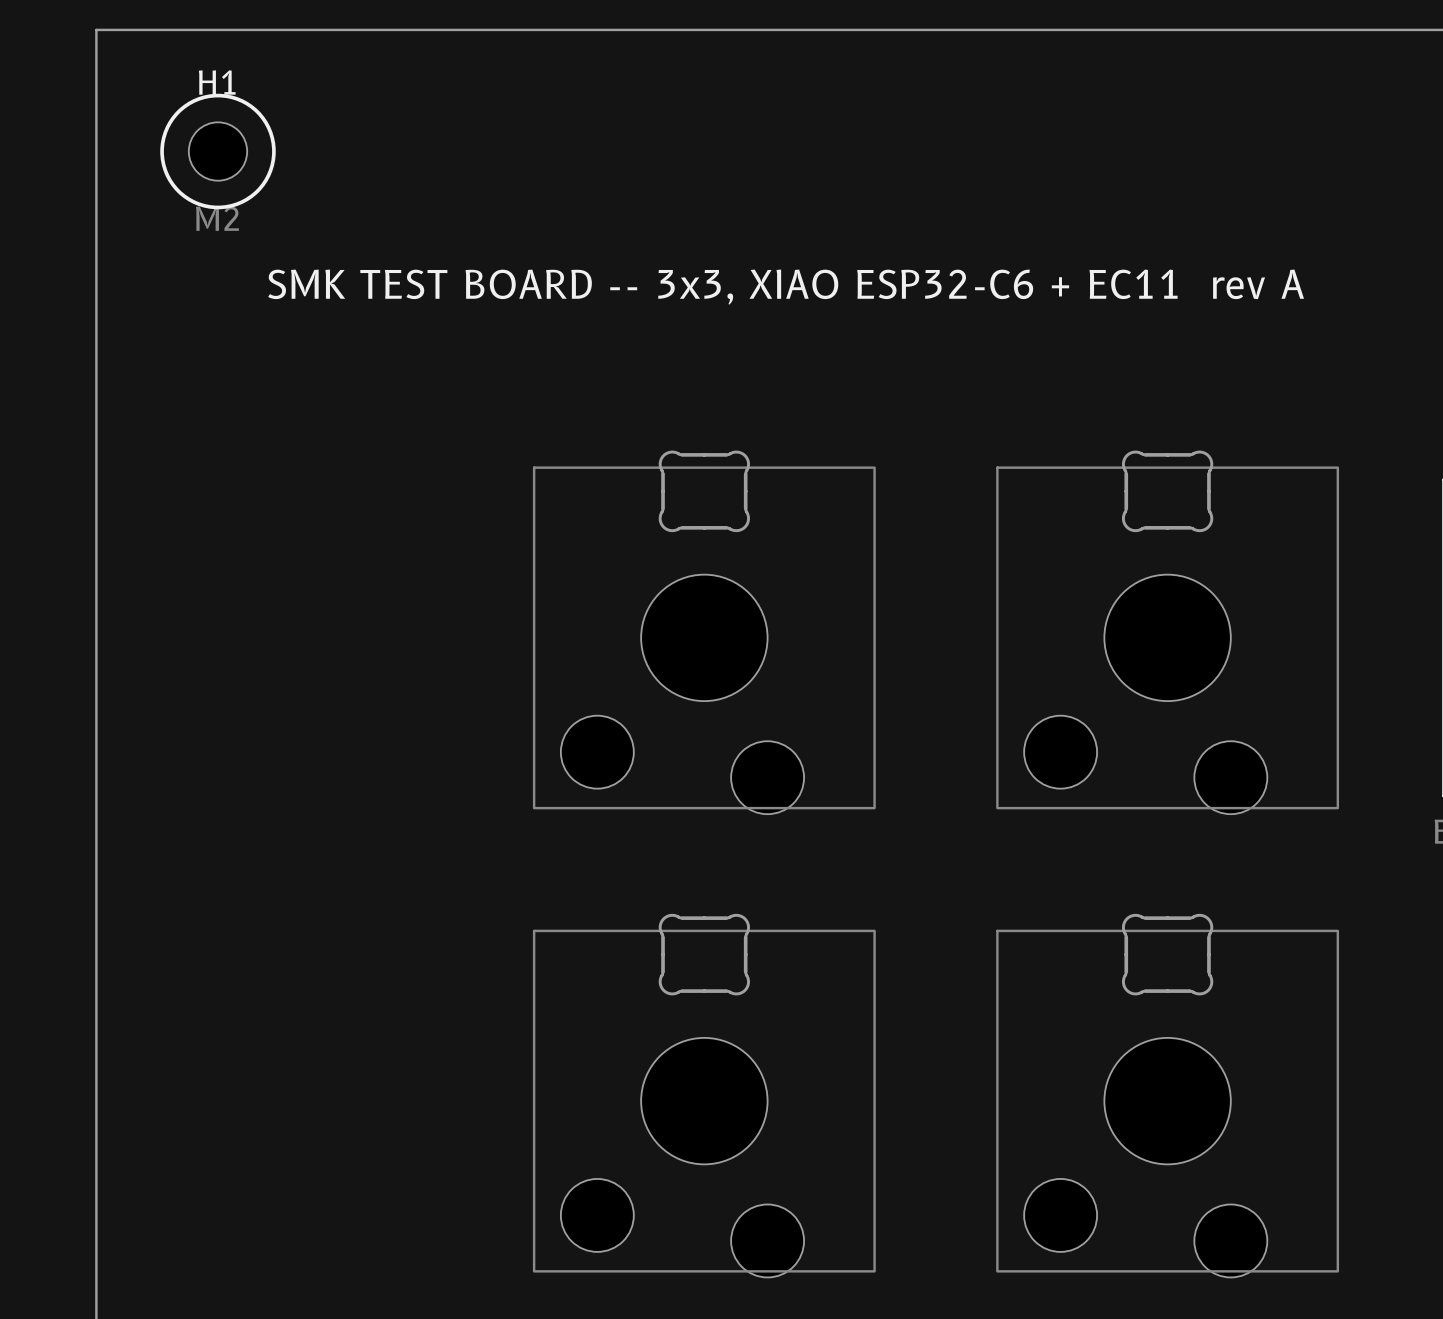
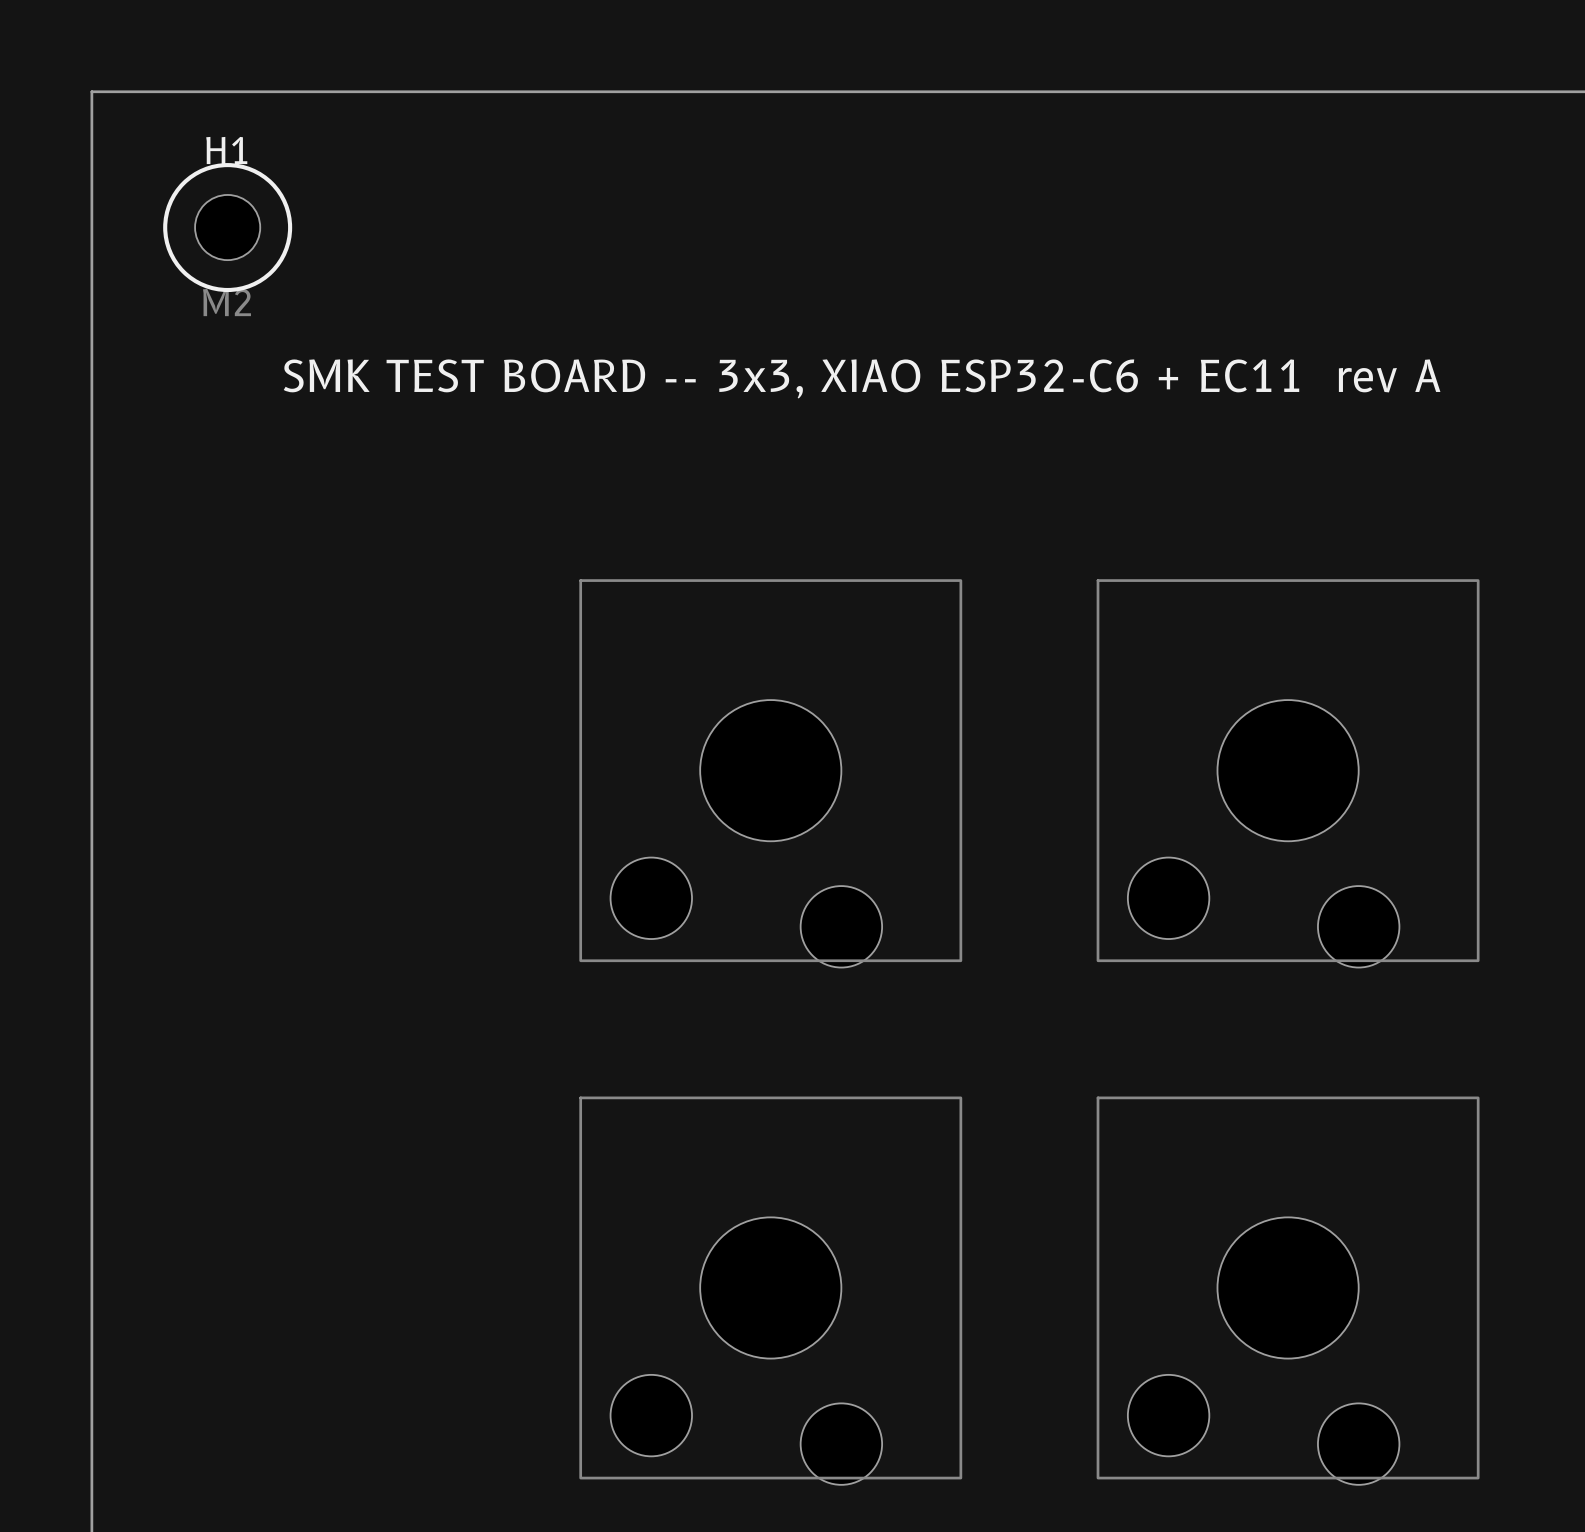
part: (704, 491) -> none
part: (1167, 491) -> none
part: (704, 954) -> none
part: (1167, 954) -> none

